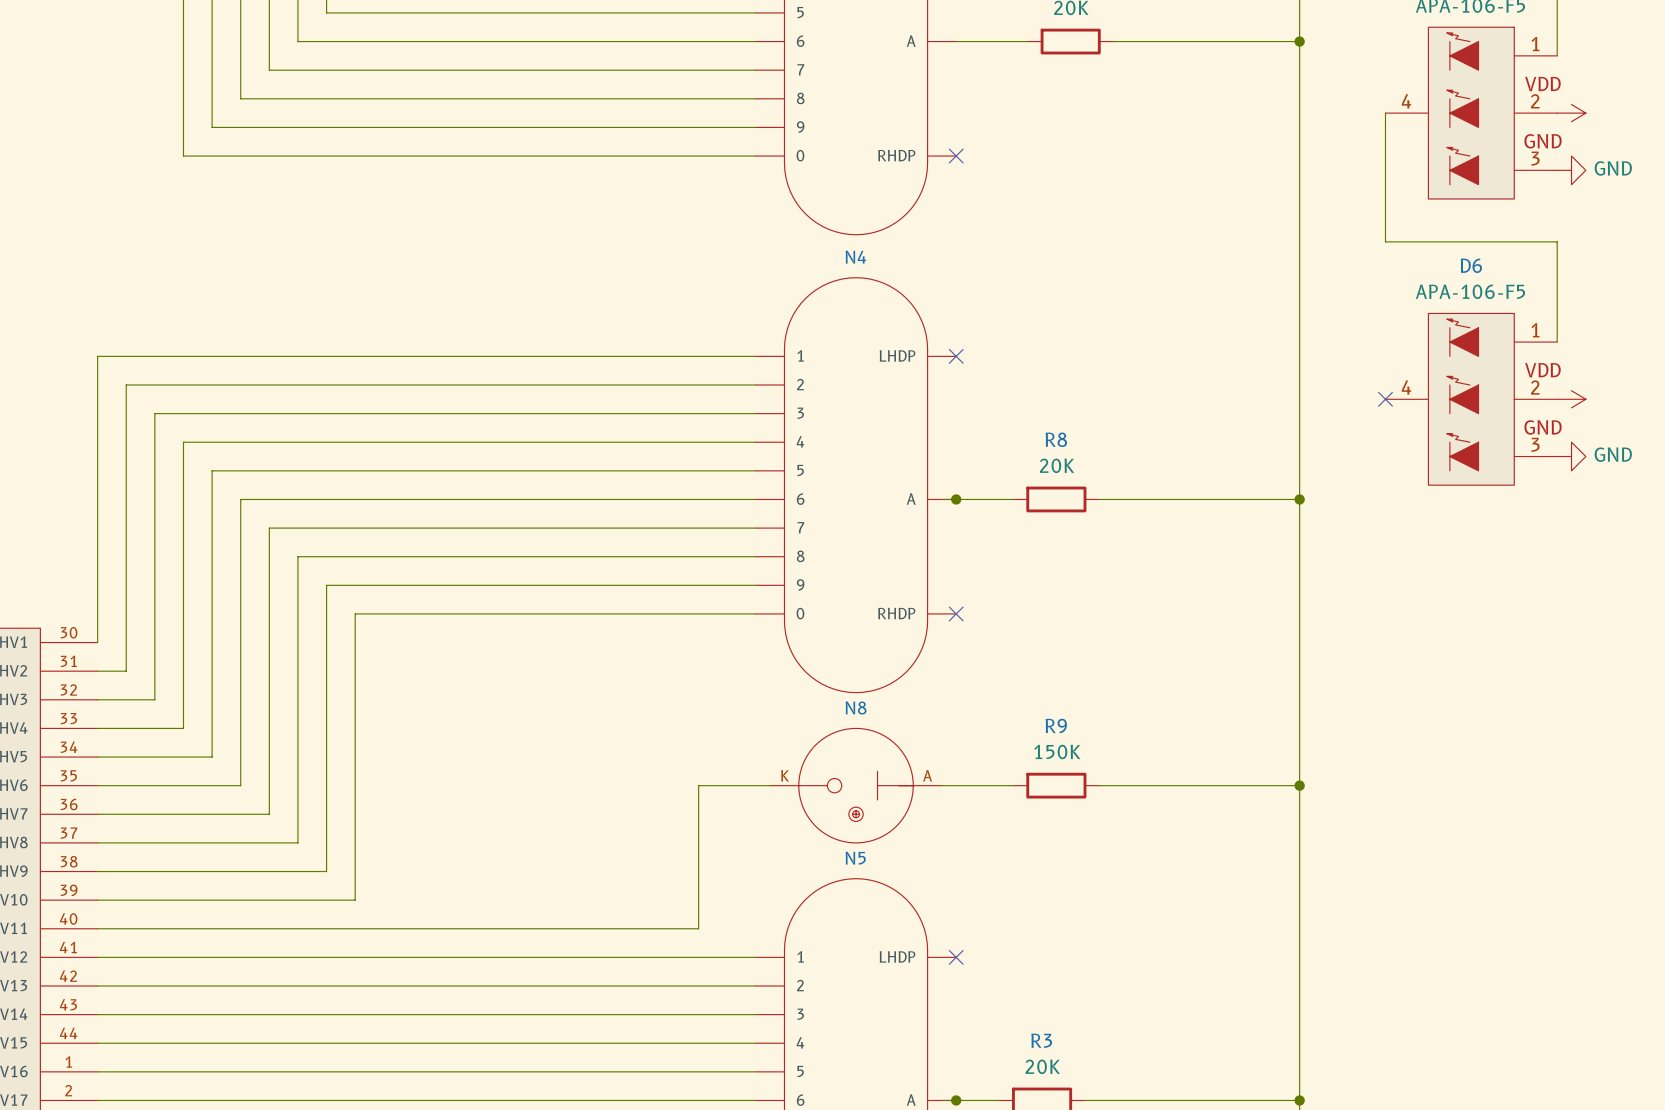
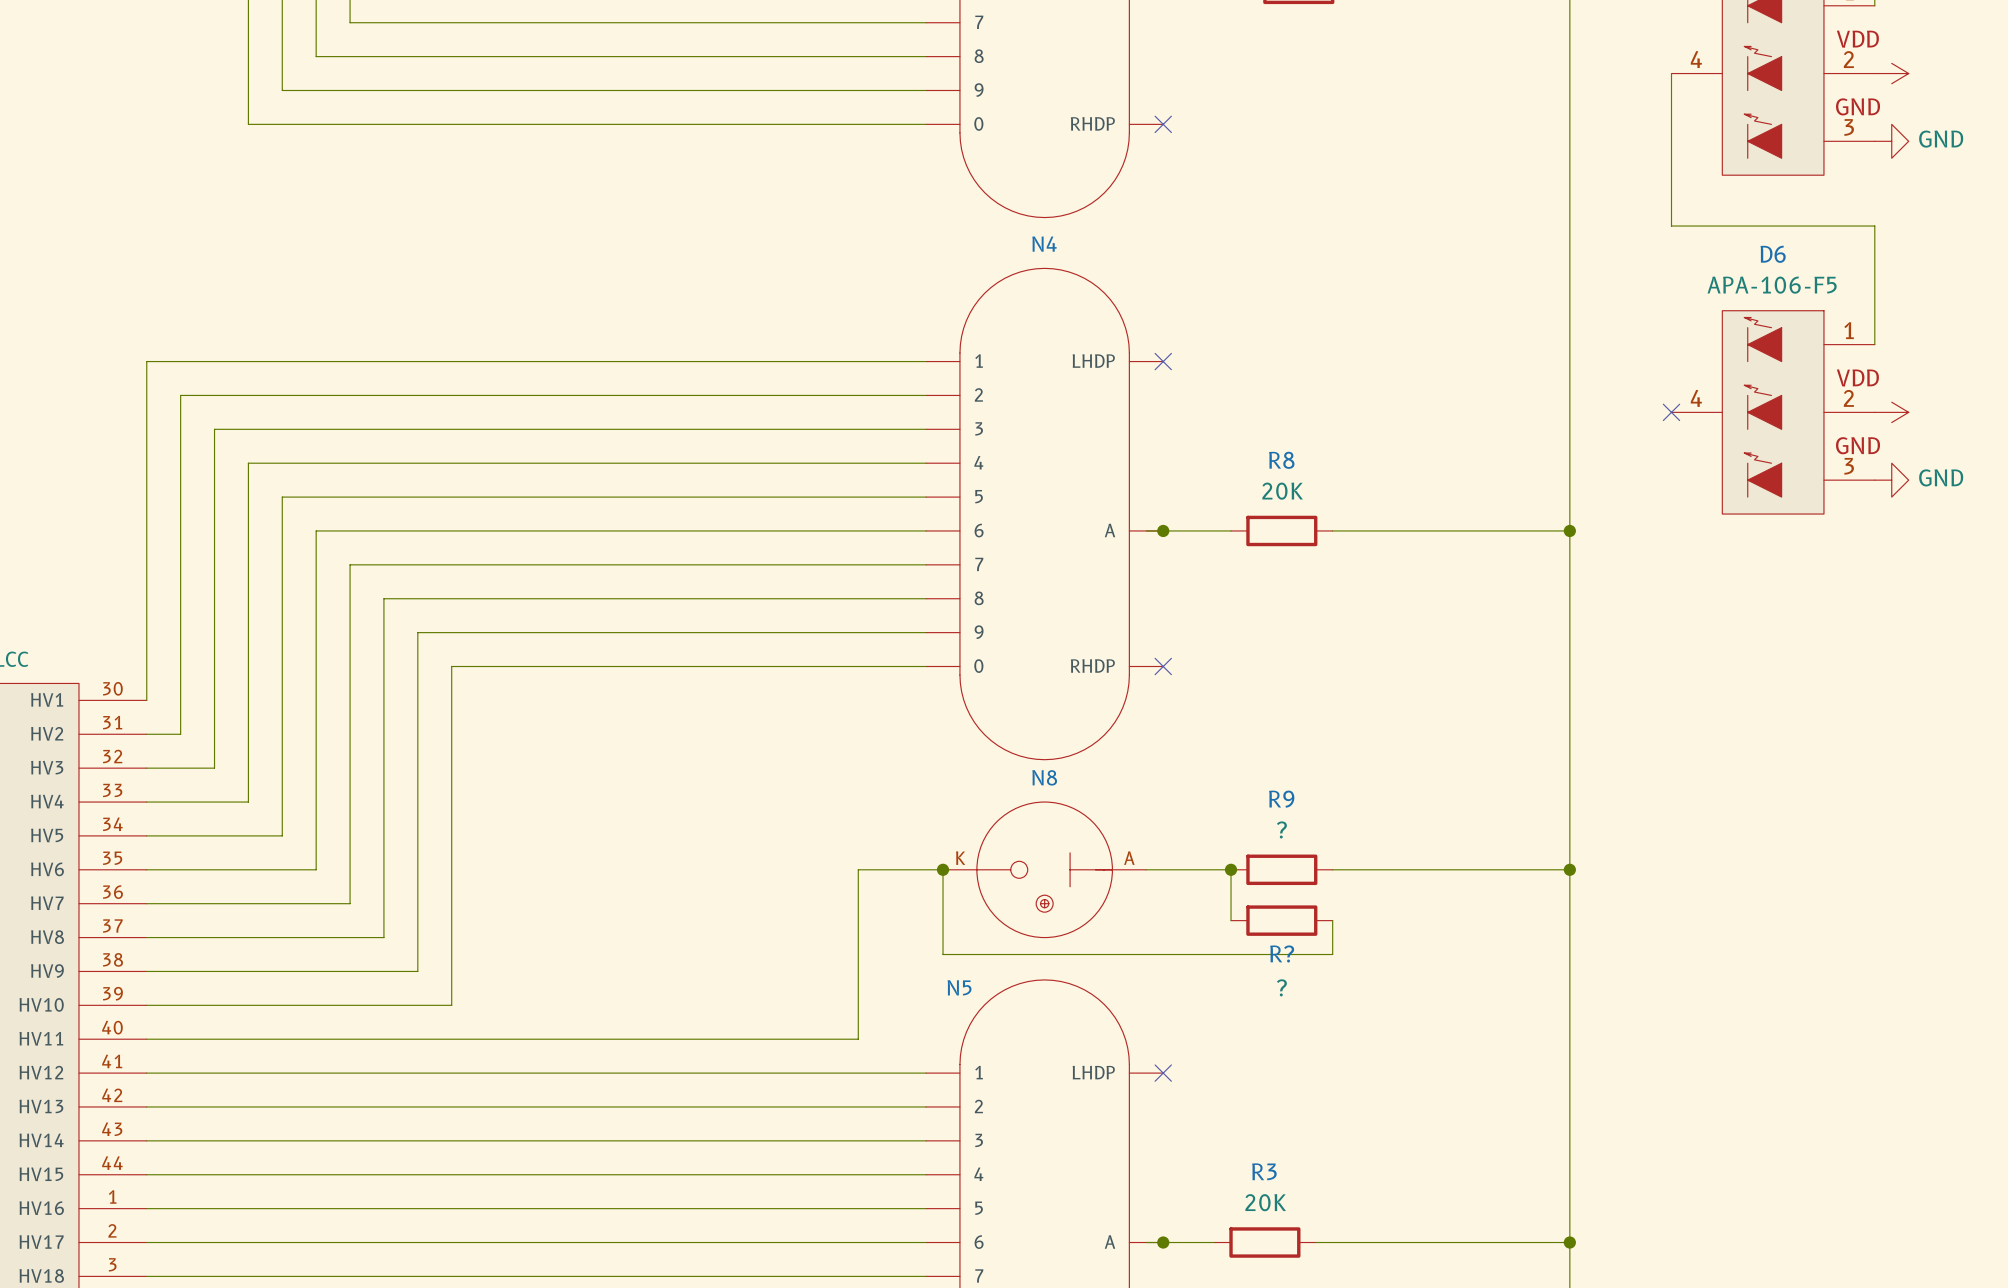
R9 value: 150K (1057, 752) -> ? (1281, 829)
wire: none -> (943, 869) (943, 954) (1332, 954) (1332, 920)
junction: none -> (943, 869)
wire: none -> (1231, 869) (1231, 920)
junction: none -> (1231, 869)
R?: none -> ? (1281, 920)
N5 name position: N5 (855, 858) -> N5 (959, 987)

